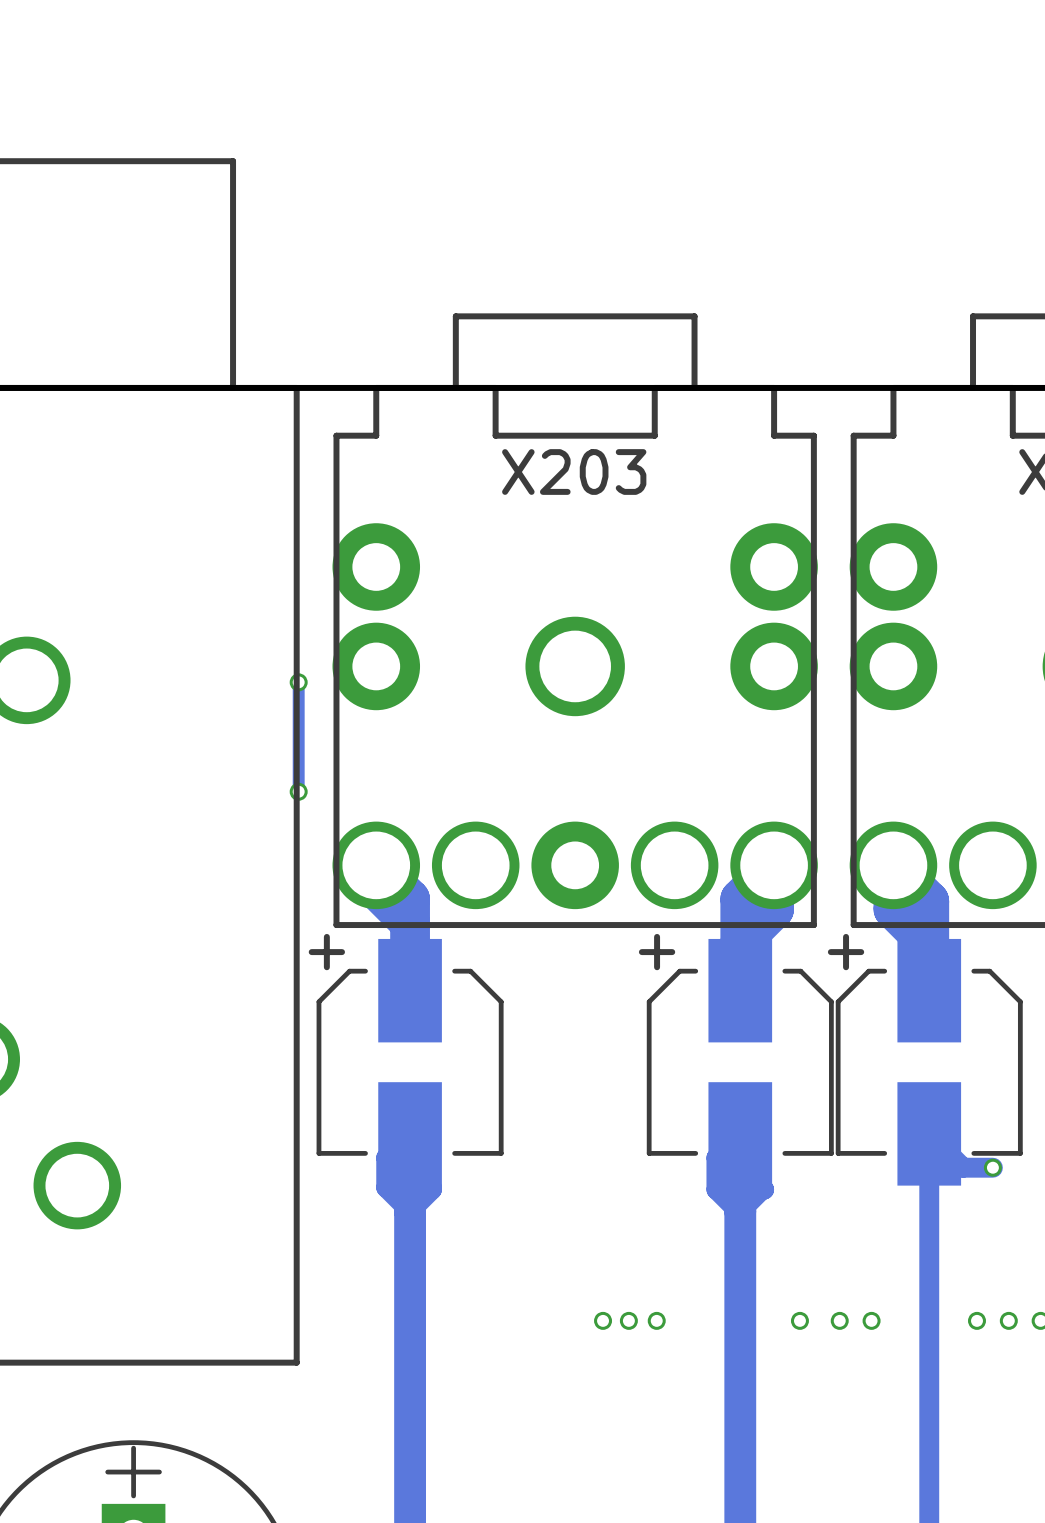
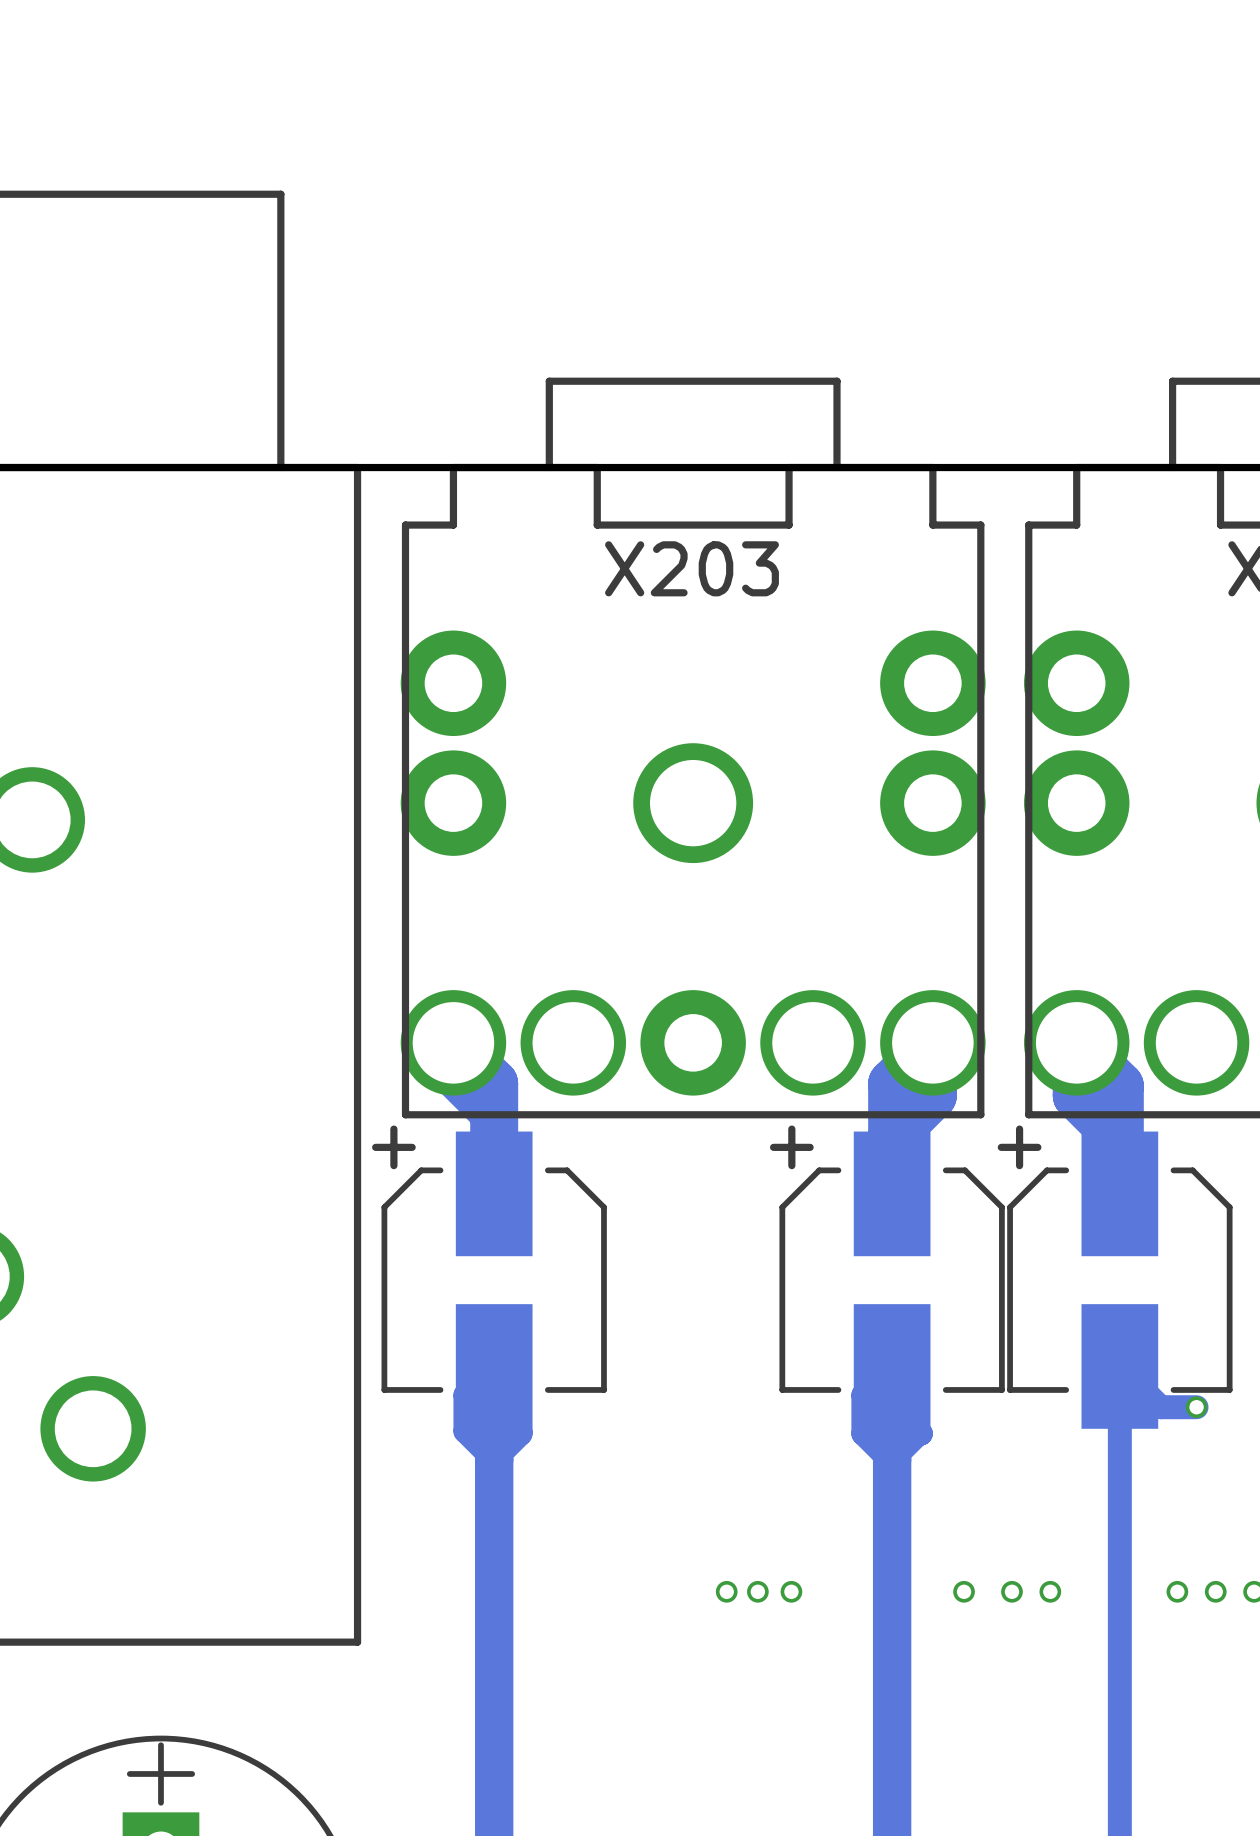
track: (298, 682) (298, 791) -> none
via: (298, 682) -> none
via: (298, 791) -> none

